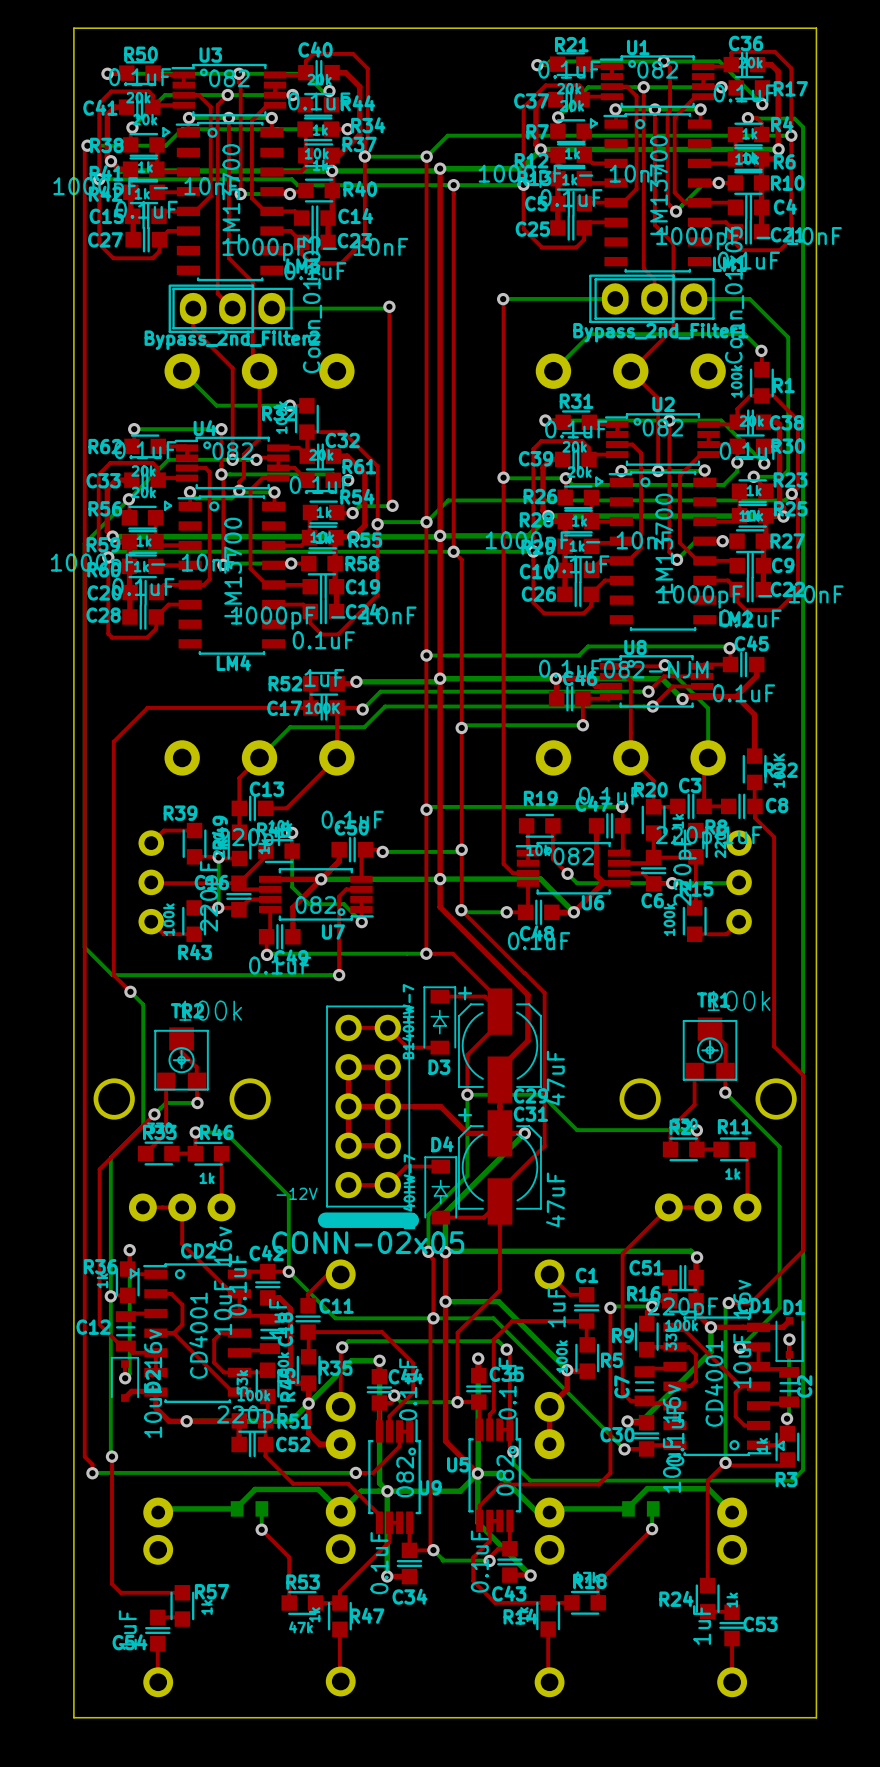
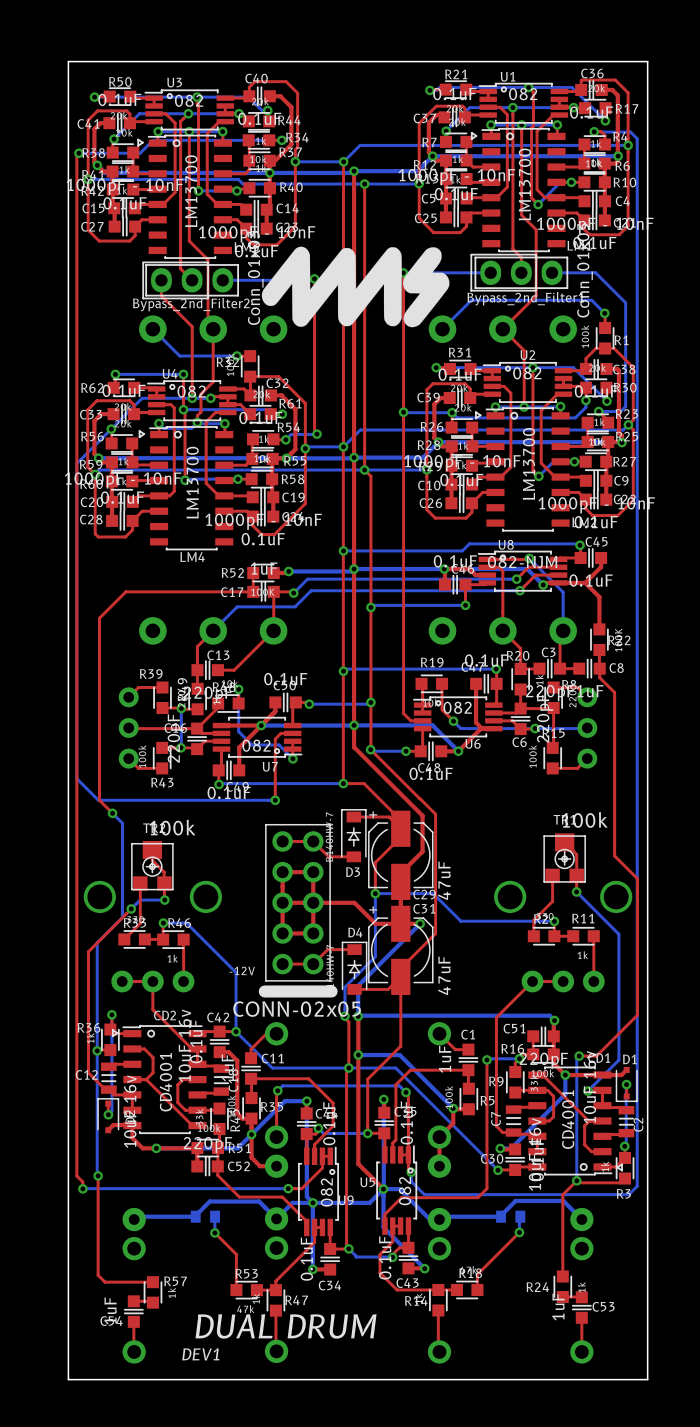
drawing: none -> [261, 246, 450, 328]
text: none -> DUAL DRUM (286, 1326)
text: none -> DEV1 (200, 1354)

